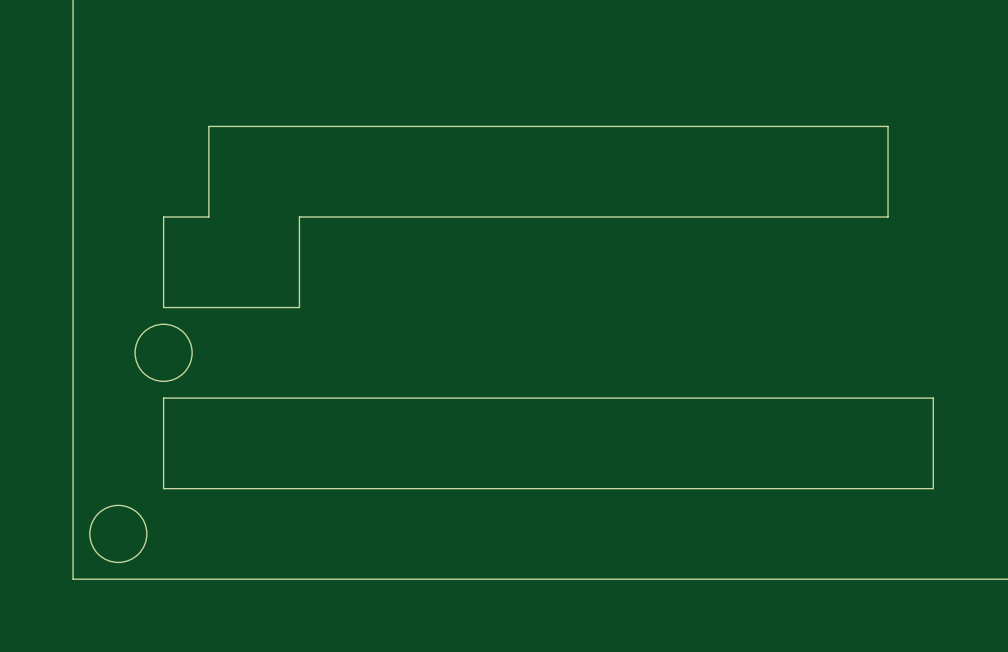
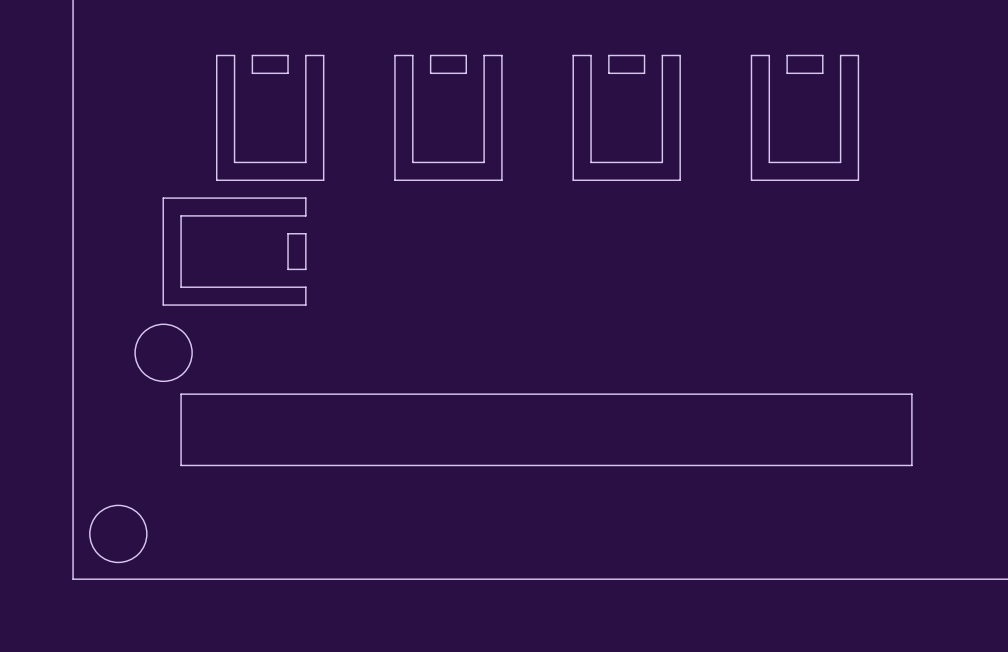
board edge: none -> (288, 55) (252, 55) (252, 73) (288, 73) (288, 55)
board edge: none -> (323, 55) (305, 55) (305, 162) (234, 162) (234, 55) (216, 55) (216, 180) (323, 180) (323, 55)
board edge: none -> (466, 55) (430, 55) (430, 73) (466, 73) (466, 55)
board edge: none -> (501, 55) (484, 55) (484, 162) (412, 162) (412, 55) (394, 55) (394, 180) (501, 180) (501, 55)
board edge: none -> (644, 55) (644, 73) (608, 73) (608, 55) (644, 55)
board edge: none -> (680, 55) (662, 55) (662, 162) (591, 162) (591, 55) (573, 55) (573, 180) (680, 180) (680, 55)
board edge: none -> (822, 55) (787, 55) (787, 73) (822, 73) (822, 55)
board edge: none -> (858, 55) (840, 55) (840, 162) (769, 162) (769, 55) (751, 55) (751, 180) (858, 180) (858, 55)
board edge: (888, 126) (208, 126) (208, 216) (163, 216) (163, 307) (299, 307) (299, 216) (888, 216) (888, 126) -> none
board edge: none -> (305, 198) (305, 215) (181, 215) (181, 287) (305, 287) (305, 305) (163, 305) (163, 198) (305, 198)
board edge: none -> (305, 233) (288, 233) (288, 269) (305, 269) (305, 233)
board edge: (933, 398) (163, 398) (163, 488) (933, 488) (933, 398) -> (911, 394) (911, 465) (181, 465) (181, 394) (911, 394)

